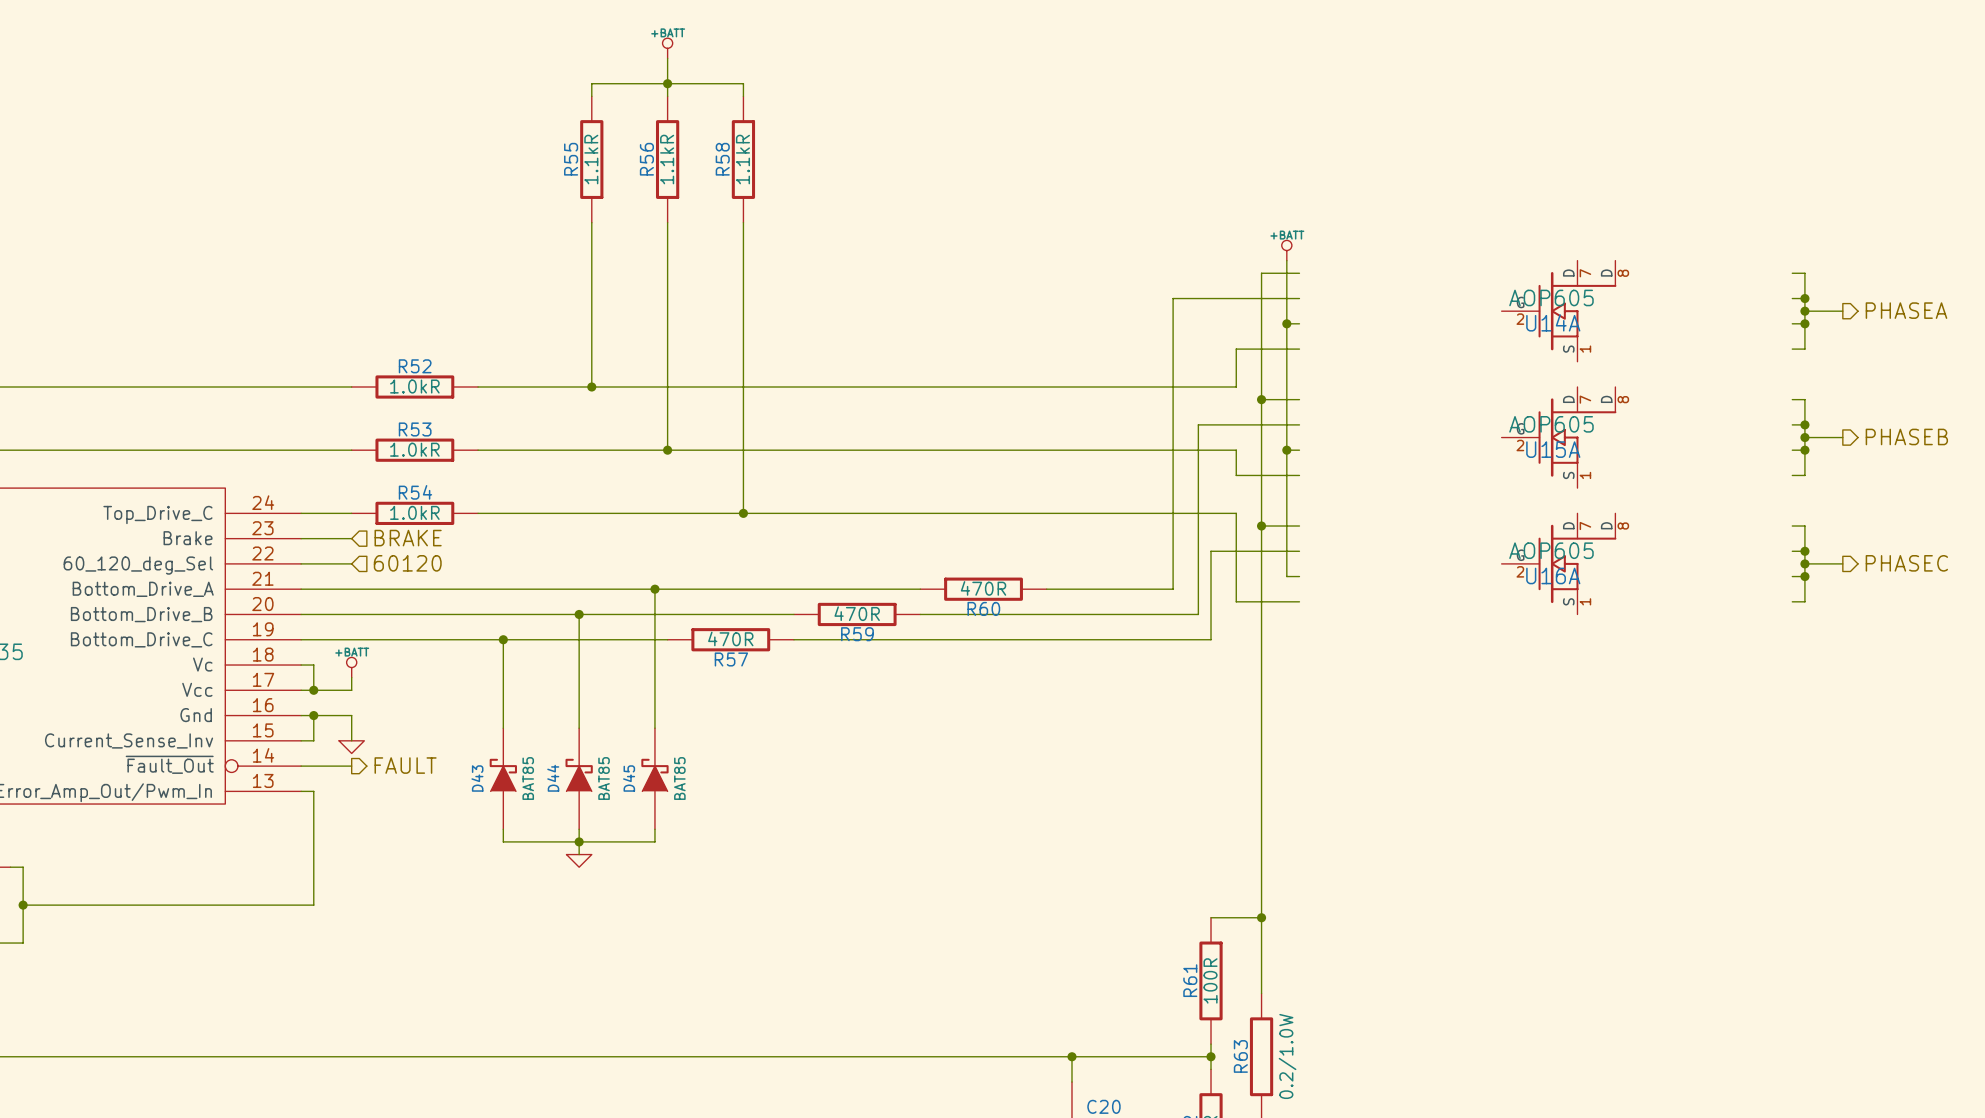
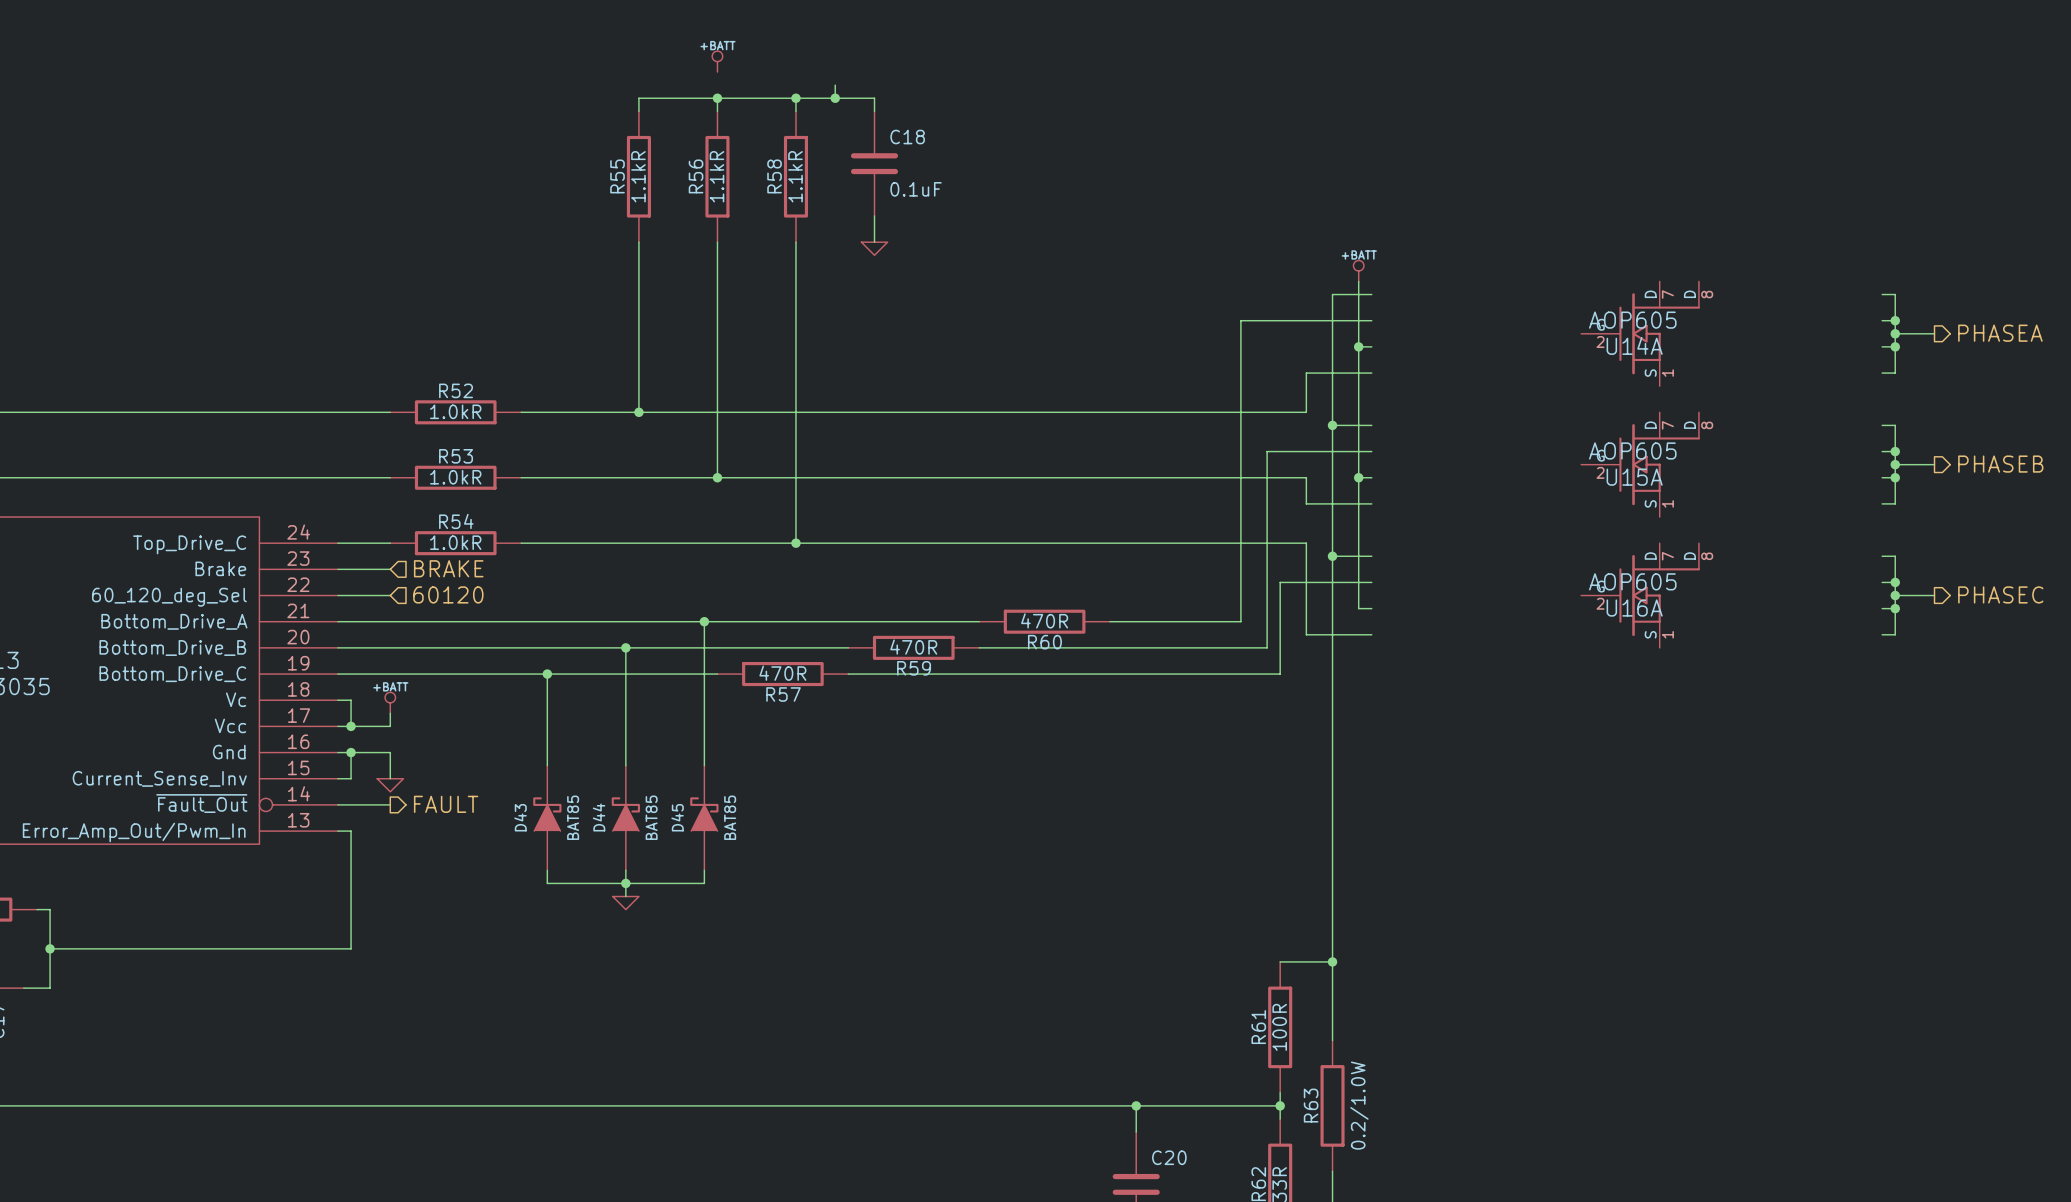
wire: (667, 58) (667, 83) -> (874, 216) (874, 242)
wire: none -> (835, 85) (835, 98)
wire: none -> (795, 98) (874, 98) (874, 111)
junction: none -> (795, 98)
junction: none -> (835, 98)
C18: none -> 0.1uF (874, 163)
power symbol: none -> (874, 248)

